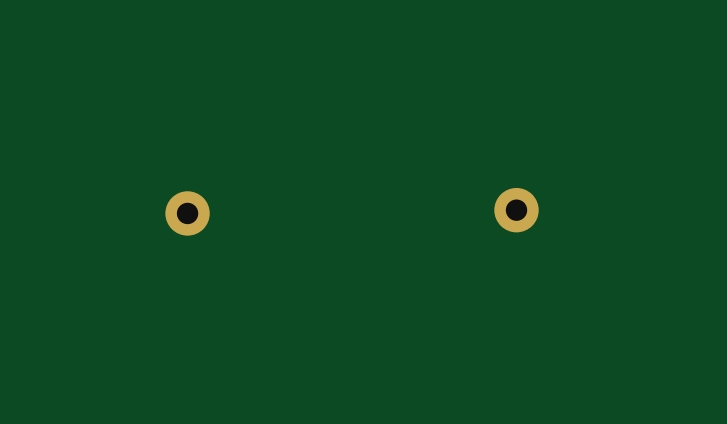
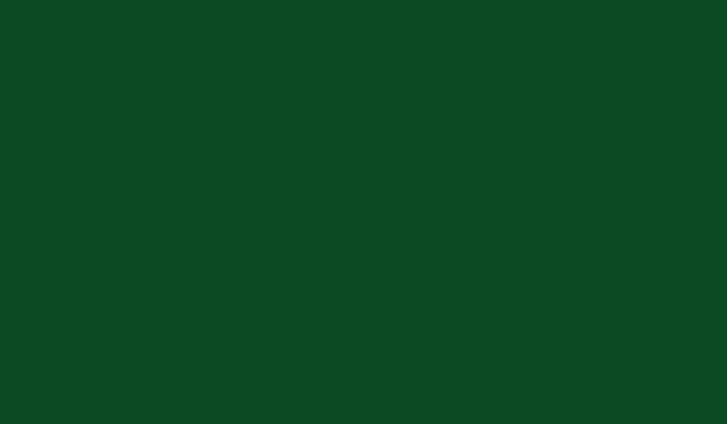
via: (516, 210) -> none
via: (187, 213) -> none

